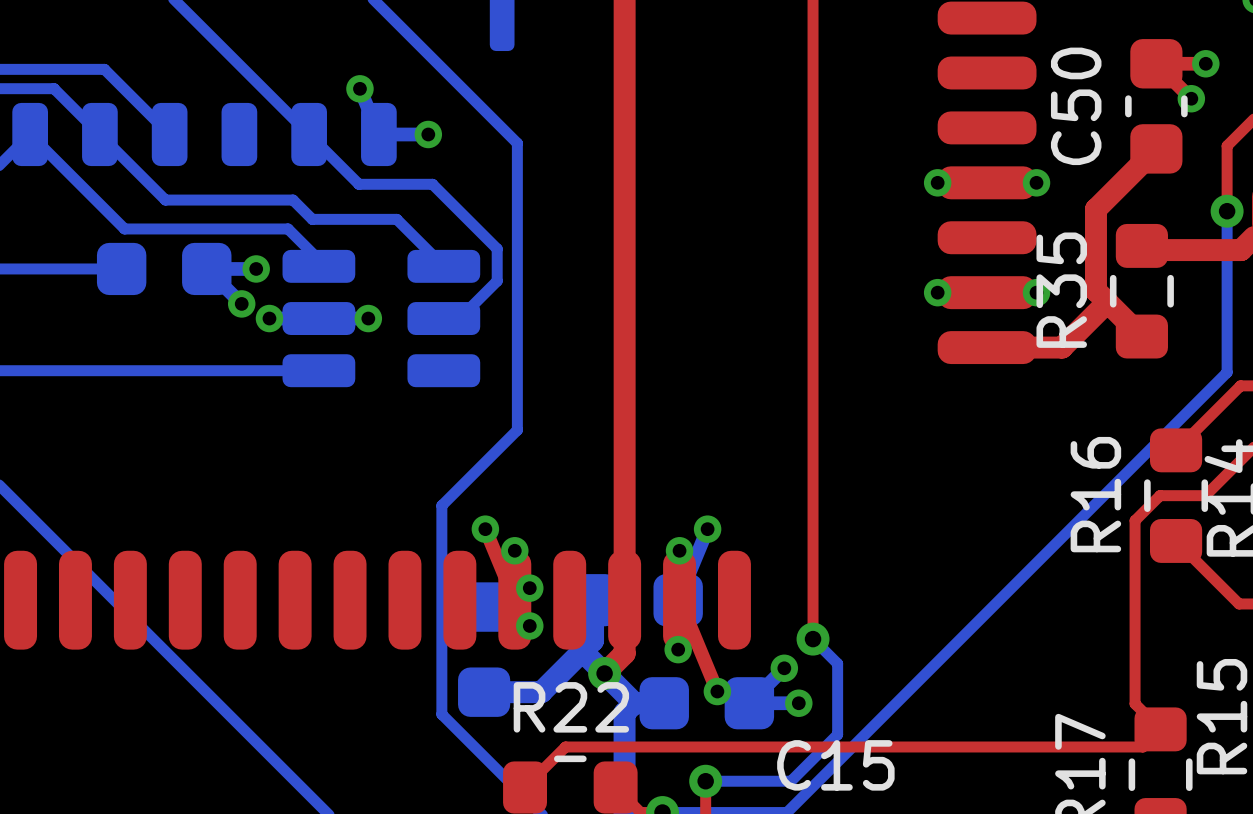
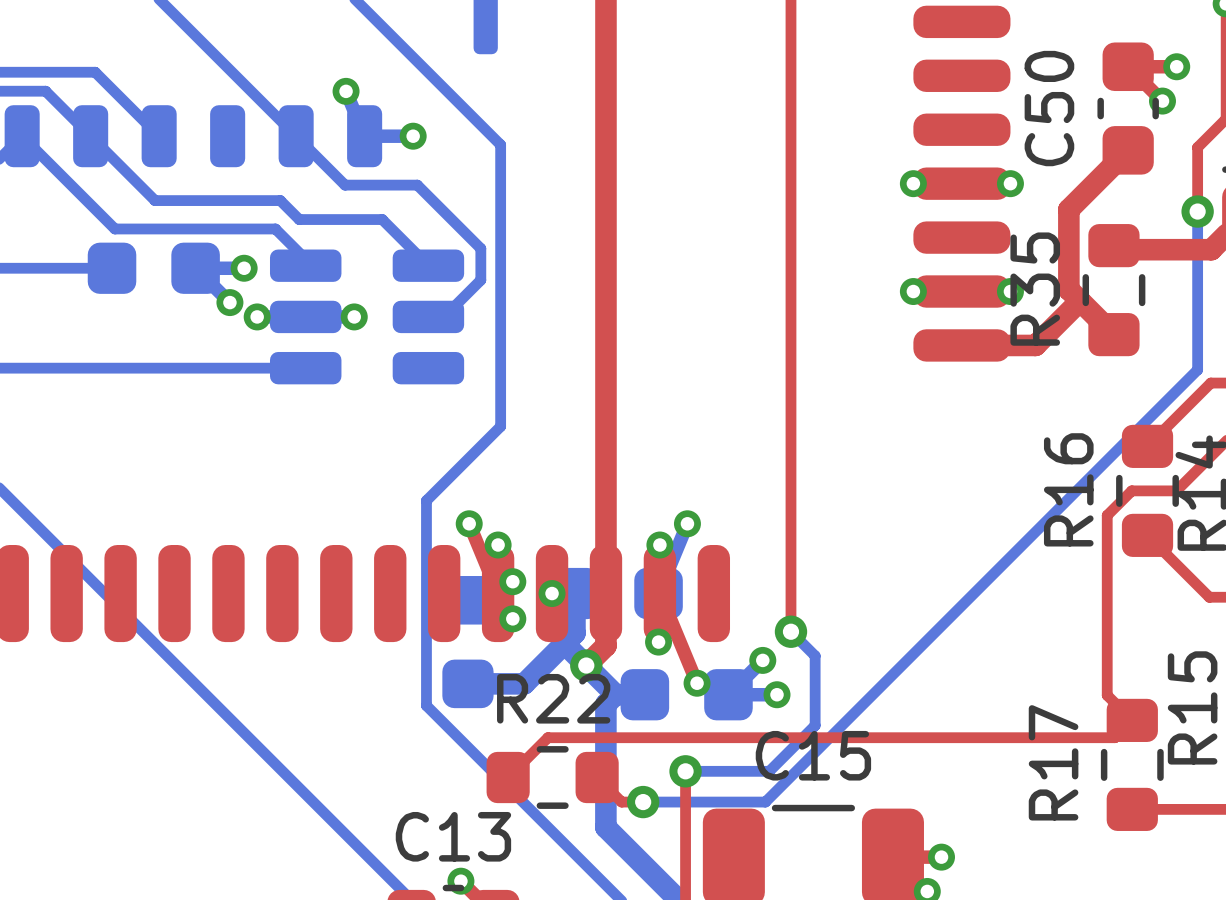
via: none -> (552, 593)

